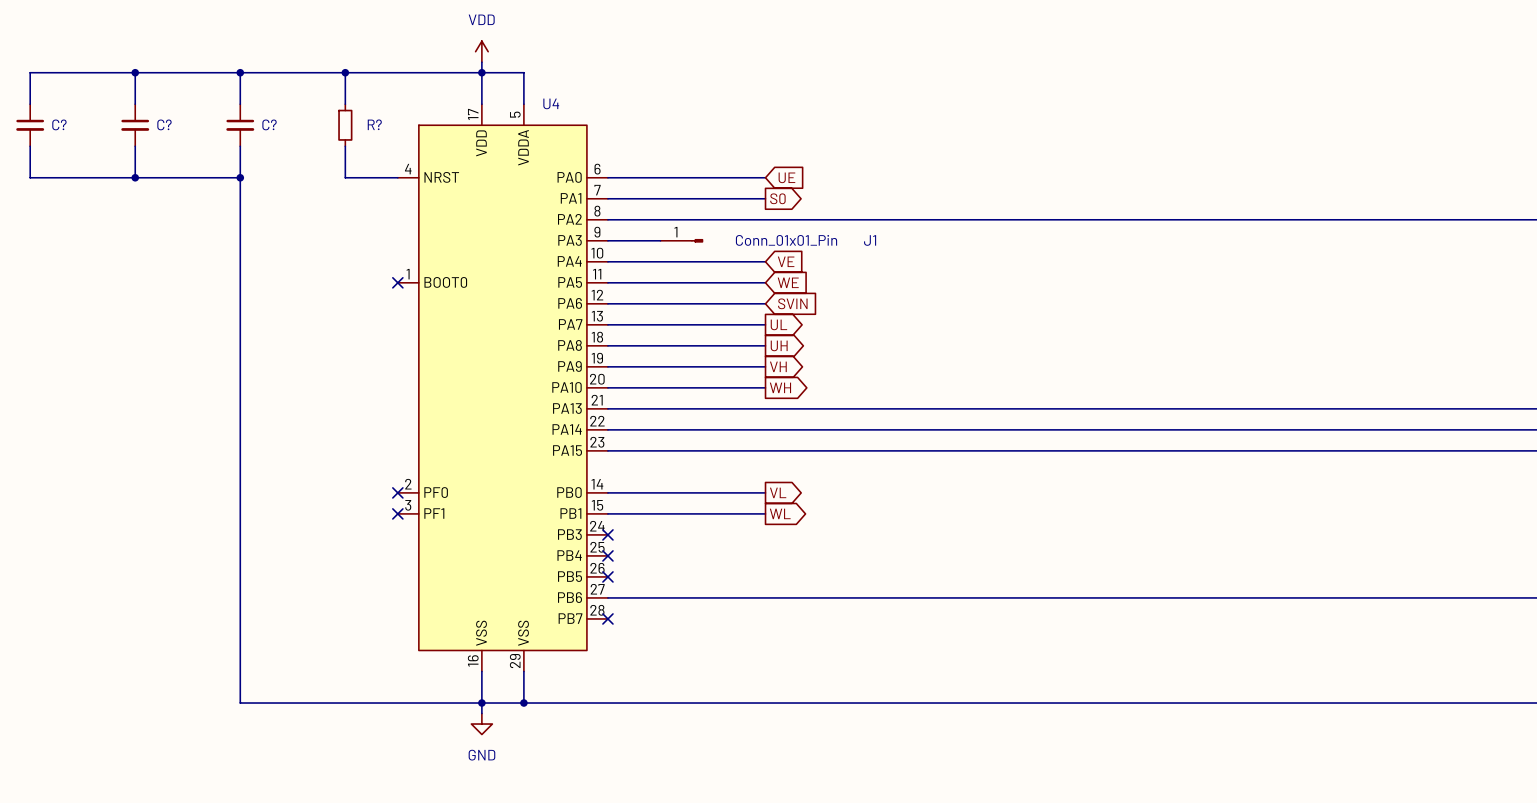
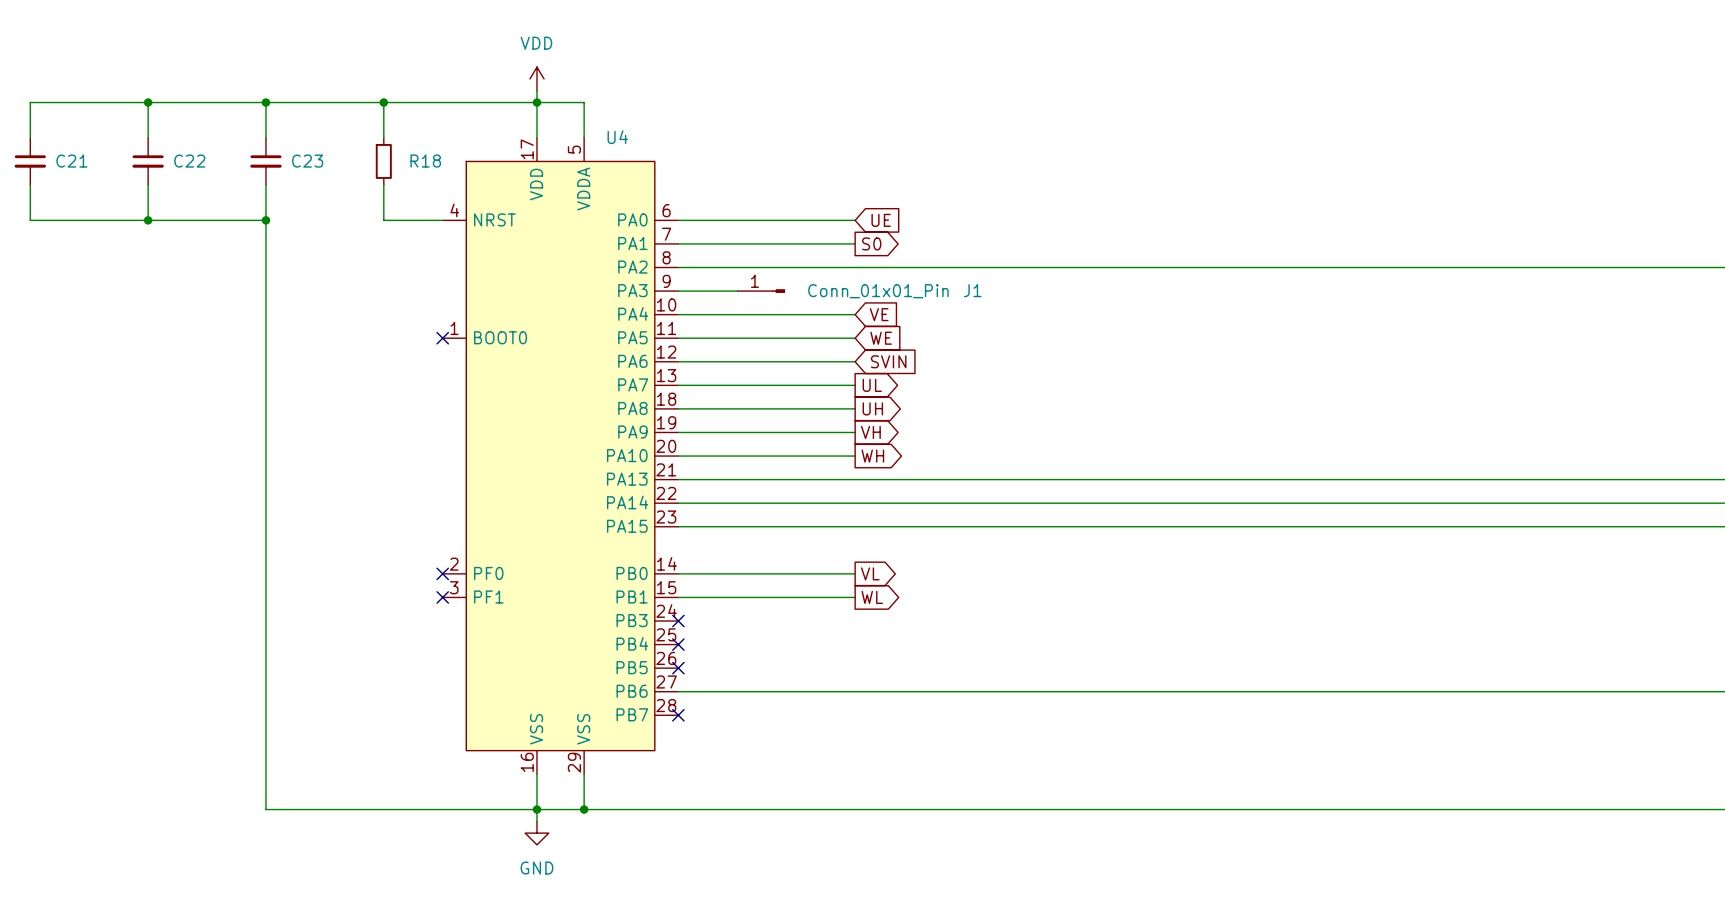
C? name: C? (59, 124) -> C21 (71, 161)
C? name: C? (164, 124) -> C22 (189, 161)
C? name: C? (269, 124) -> C23 (307, 161)
R? name: R? (374, 124) -> R18 (425, 161)

